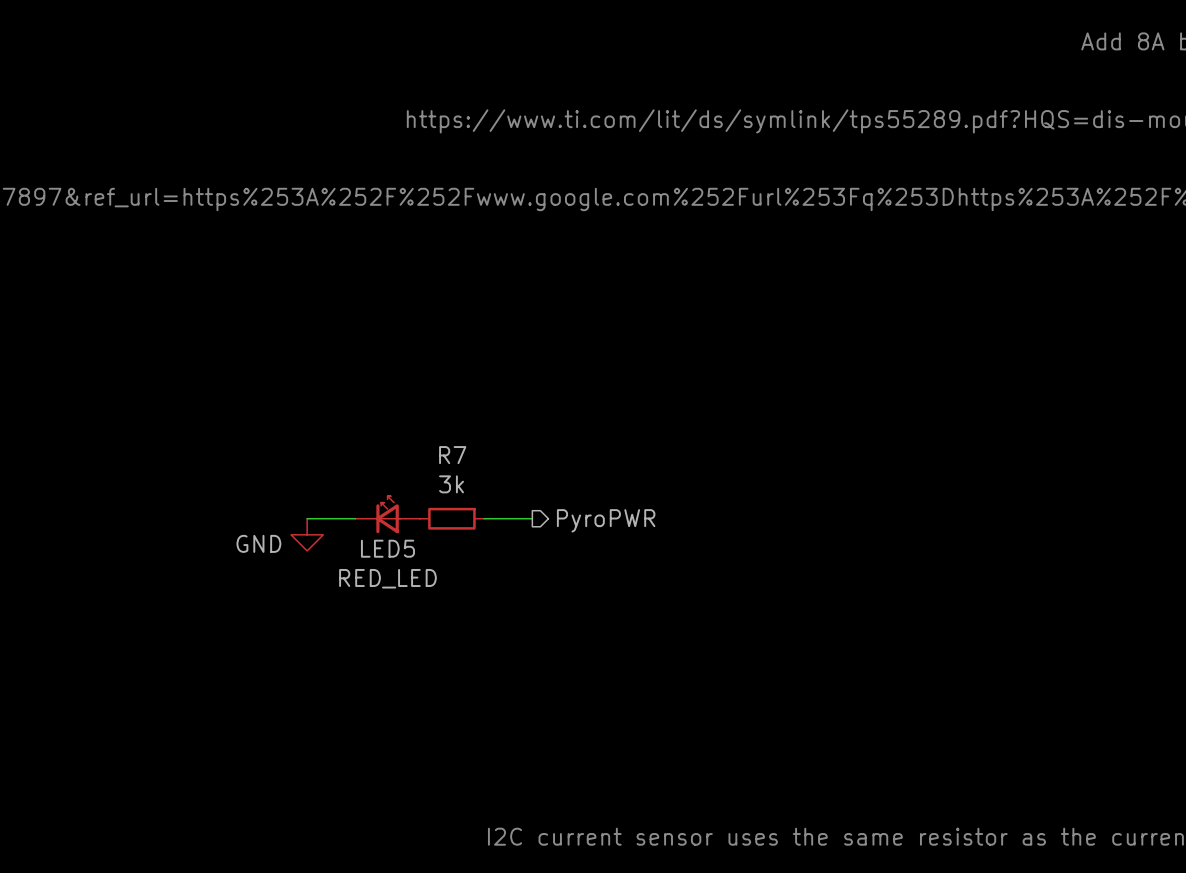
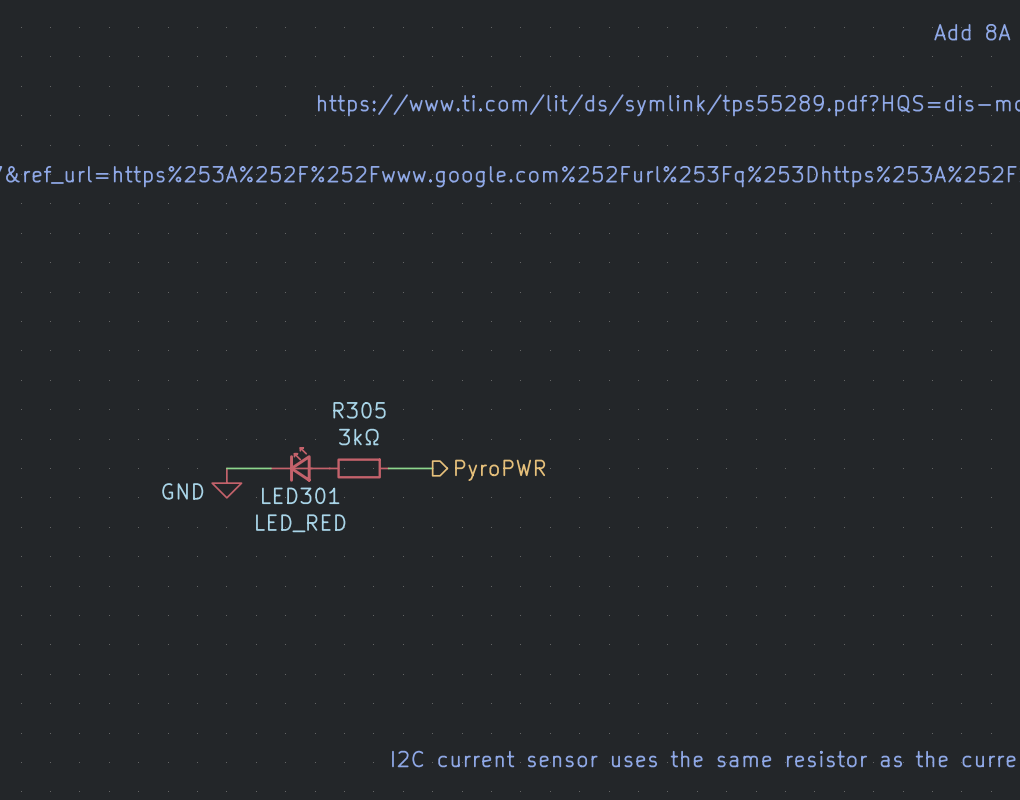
R7 name: R7 (452, 455) -> R305 (359, 410)
R7 value: 3k (451, 484) -> 3kΩ (358, 437)
LED5 name: LED5 (387, 548) -> LED301 (300, 495)
LED5 value: RED_LED (387, 578) -> LED_RED (300, 523)

